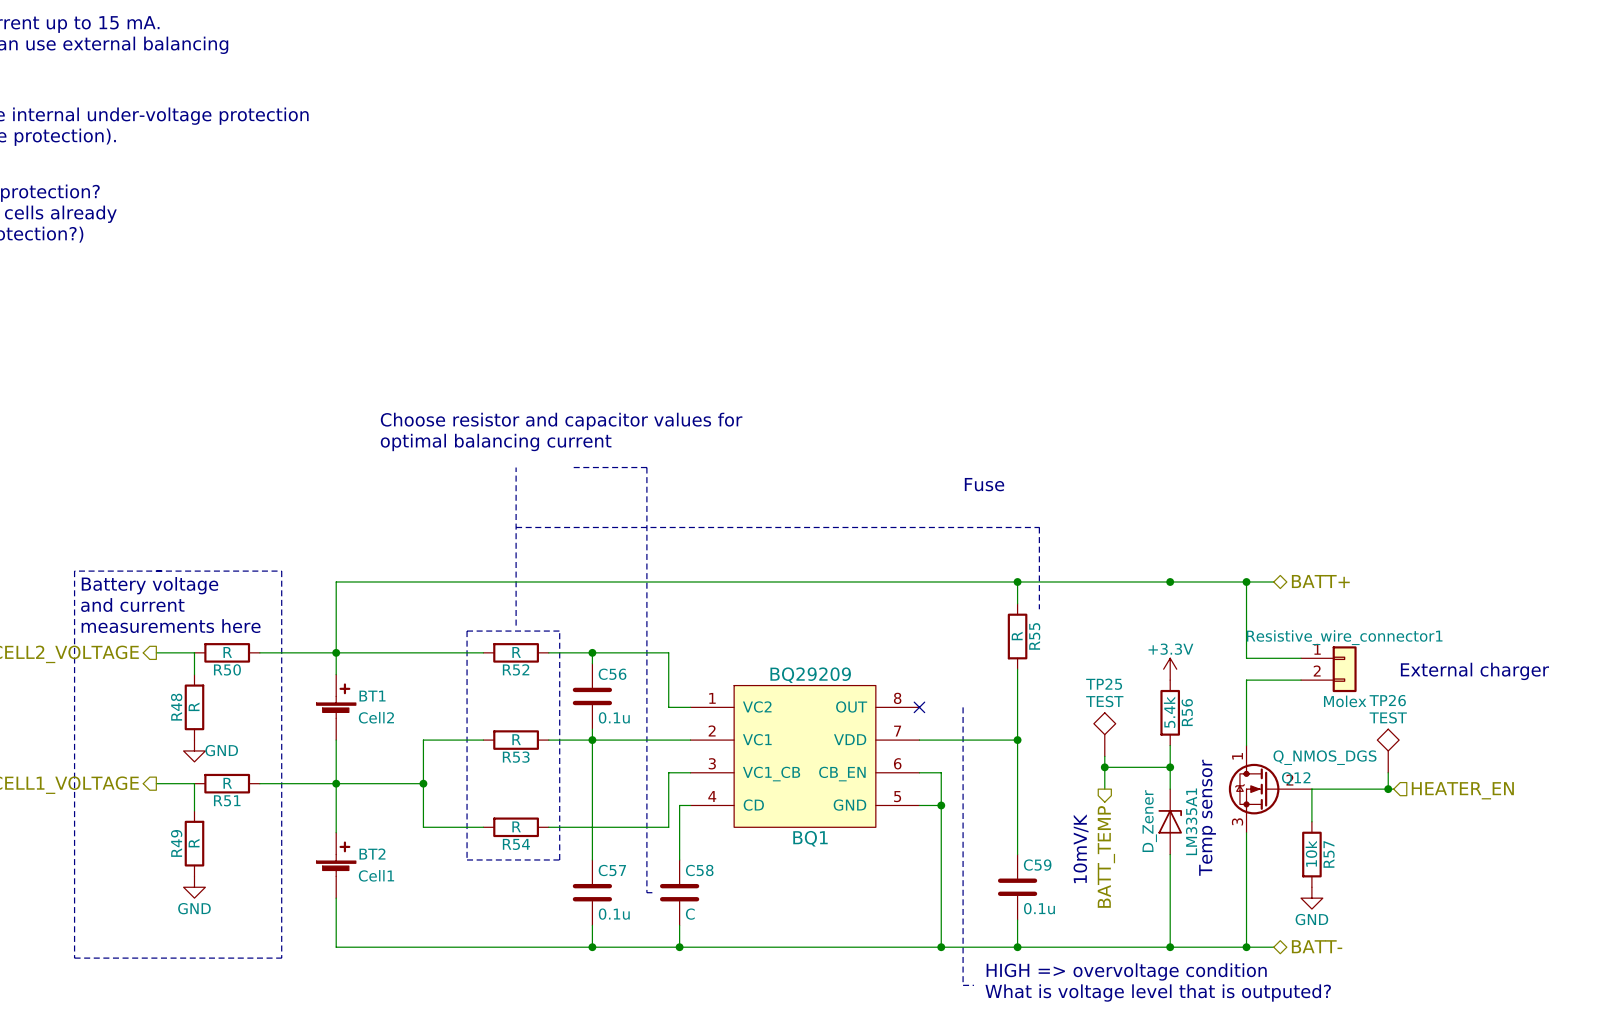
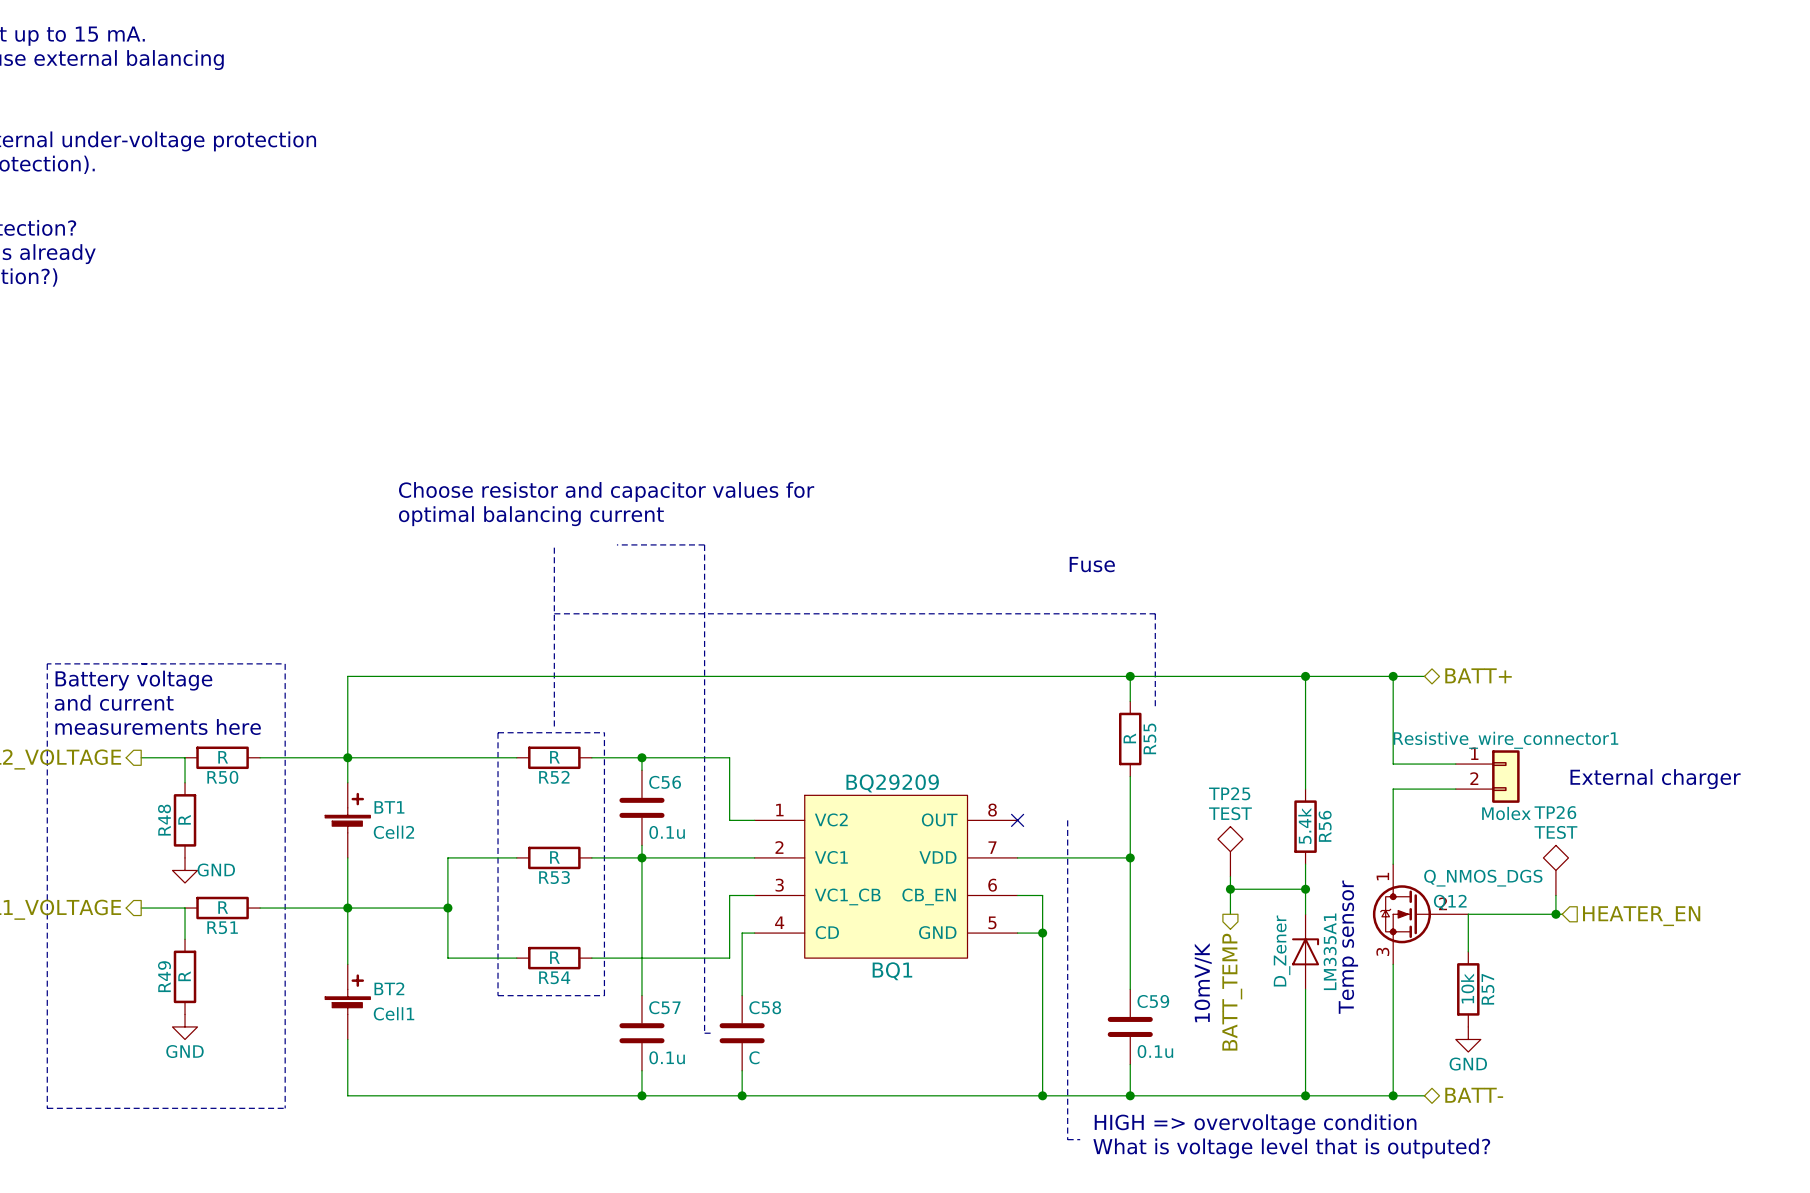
wire: none -> (1305, 676) (1305, 789)
power symbol: +3.3V (1170, 669) -> none

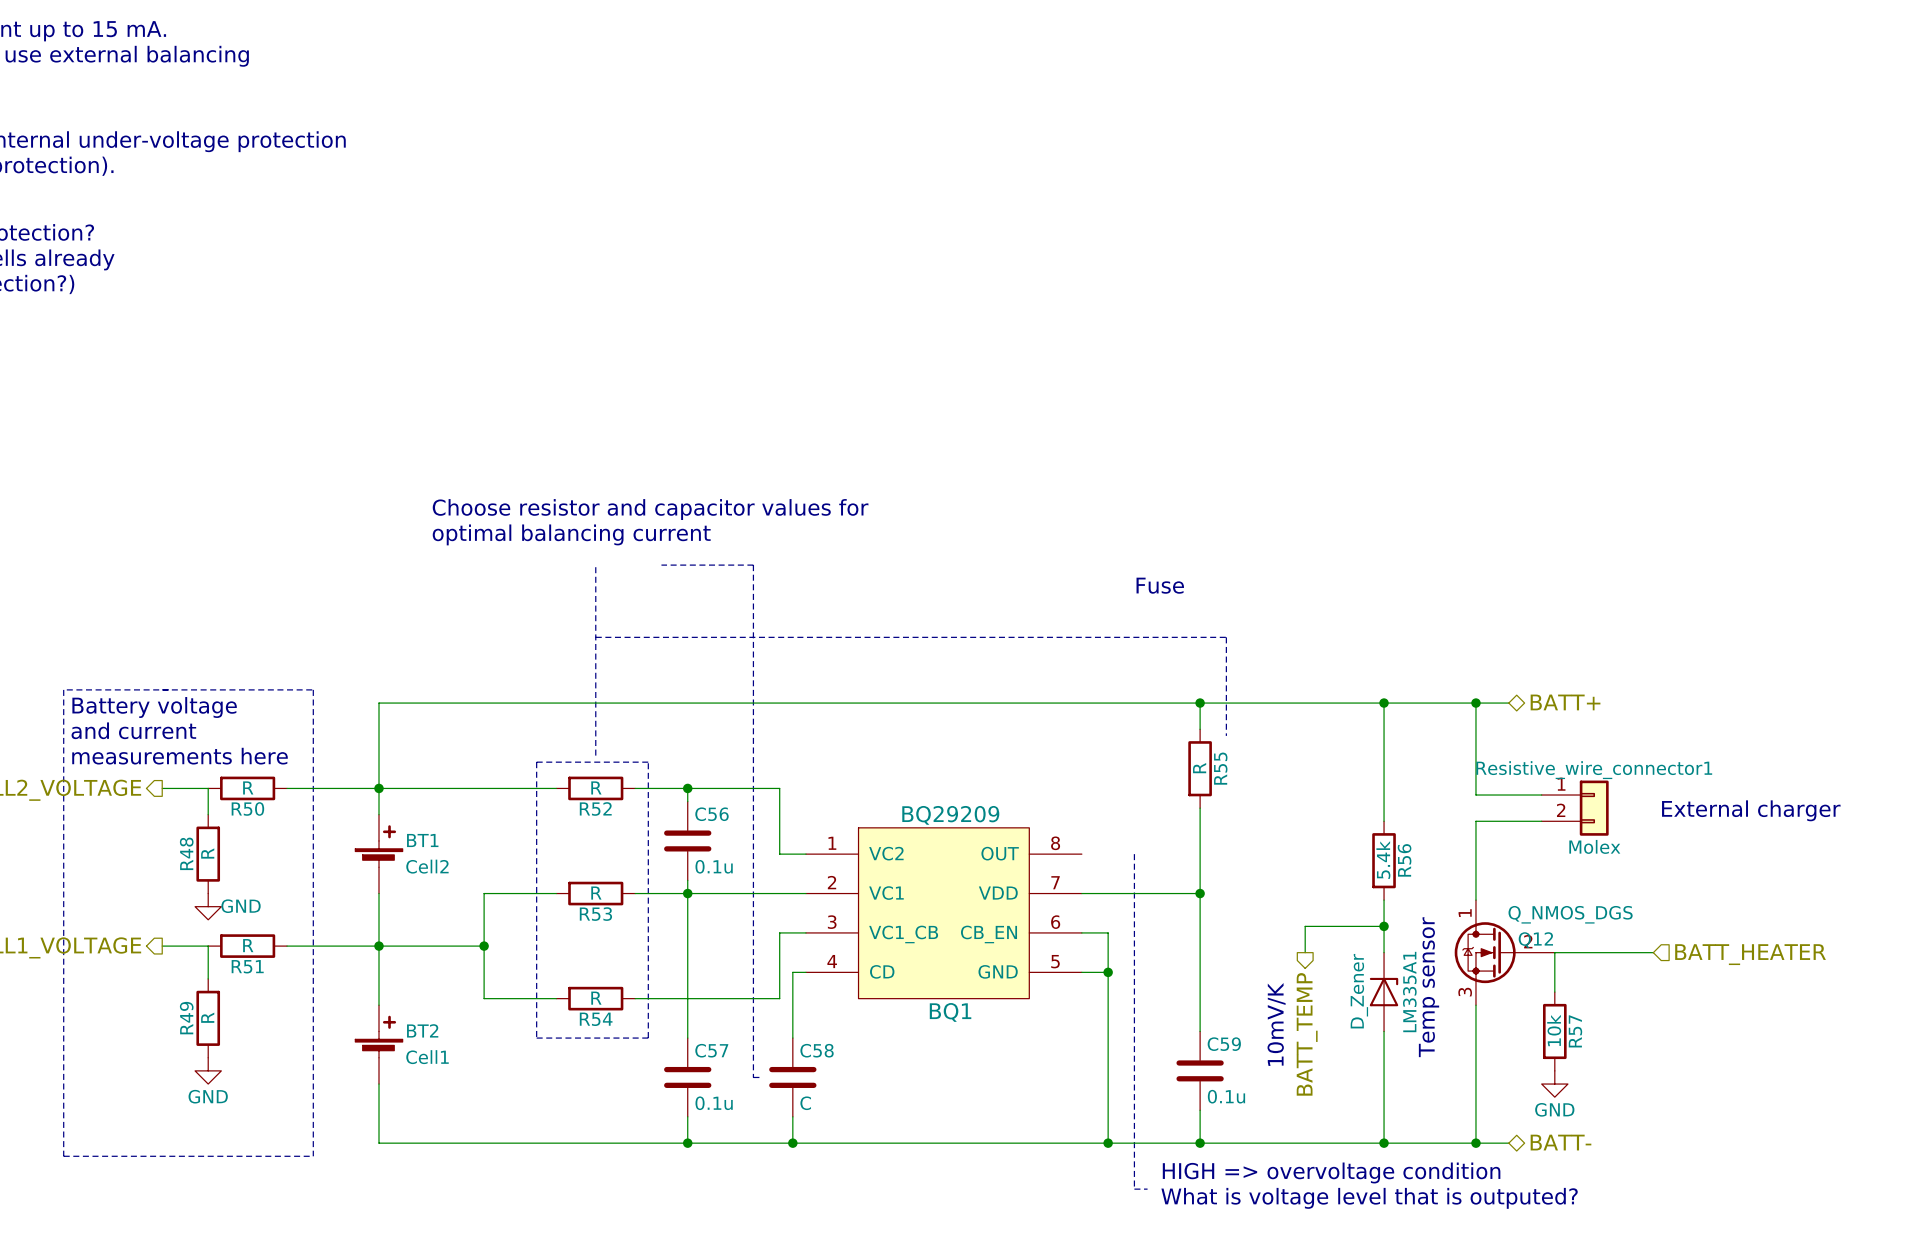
no-connect mark: (1017, 820) -> none
TP25: TEST (1230, 851) -> none
TP26: TEST (1555, 870) -> none
wire: (1230, 876) (1230, 889) -> none
junction: (1230, 889) -> none
wire: (1555, 895) (1555, 914) -> none
junction: (1555, 914) -> none
hierarchical label: HEATER_EN (1641, 916) -> BATT_HEATER (1750, 954)

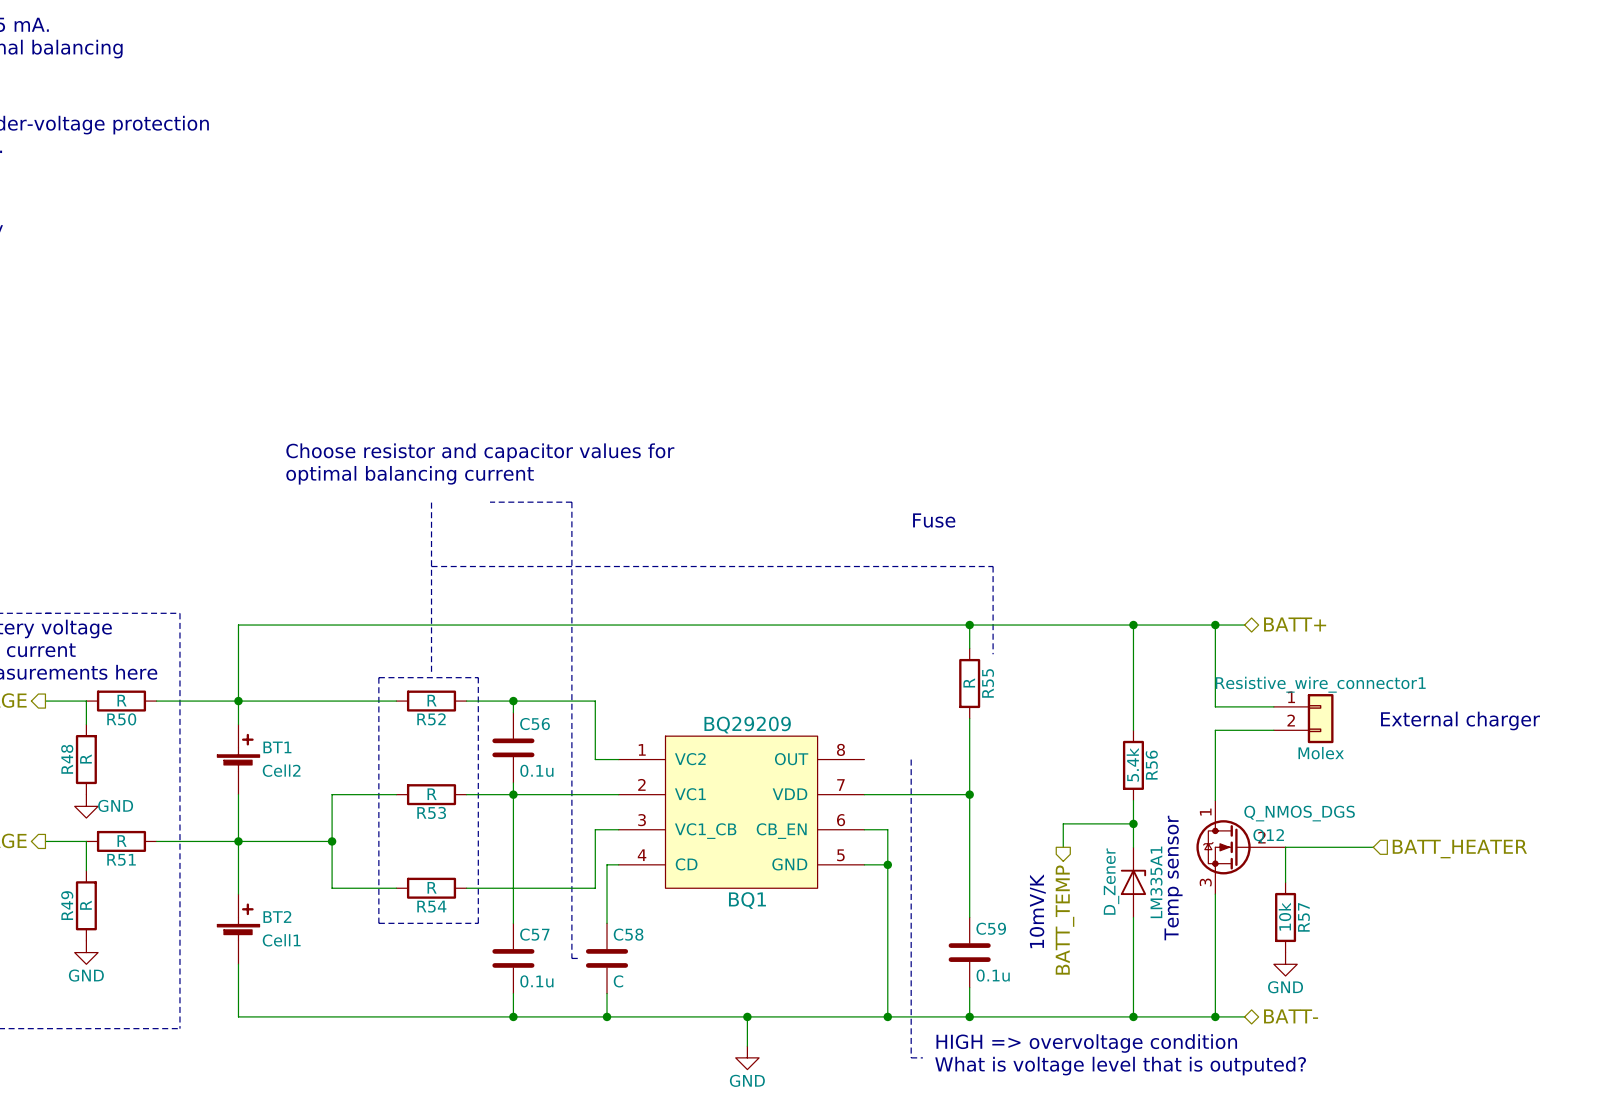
wire: none -> (747, 1016) (747, 1046)
junction: none -> (747, 1016)
power symbol: none -> GND (747, 1057)

